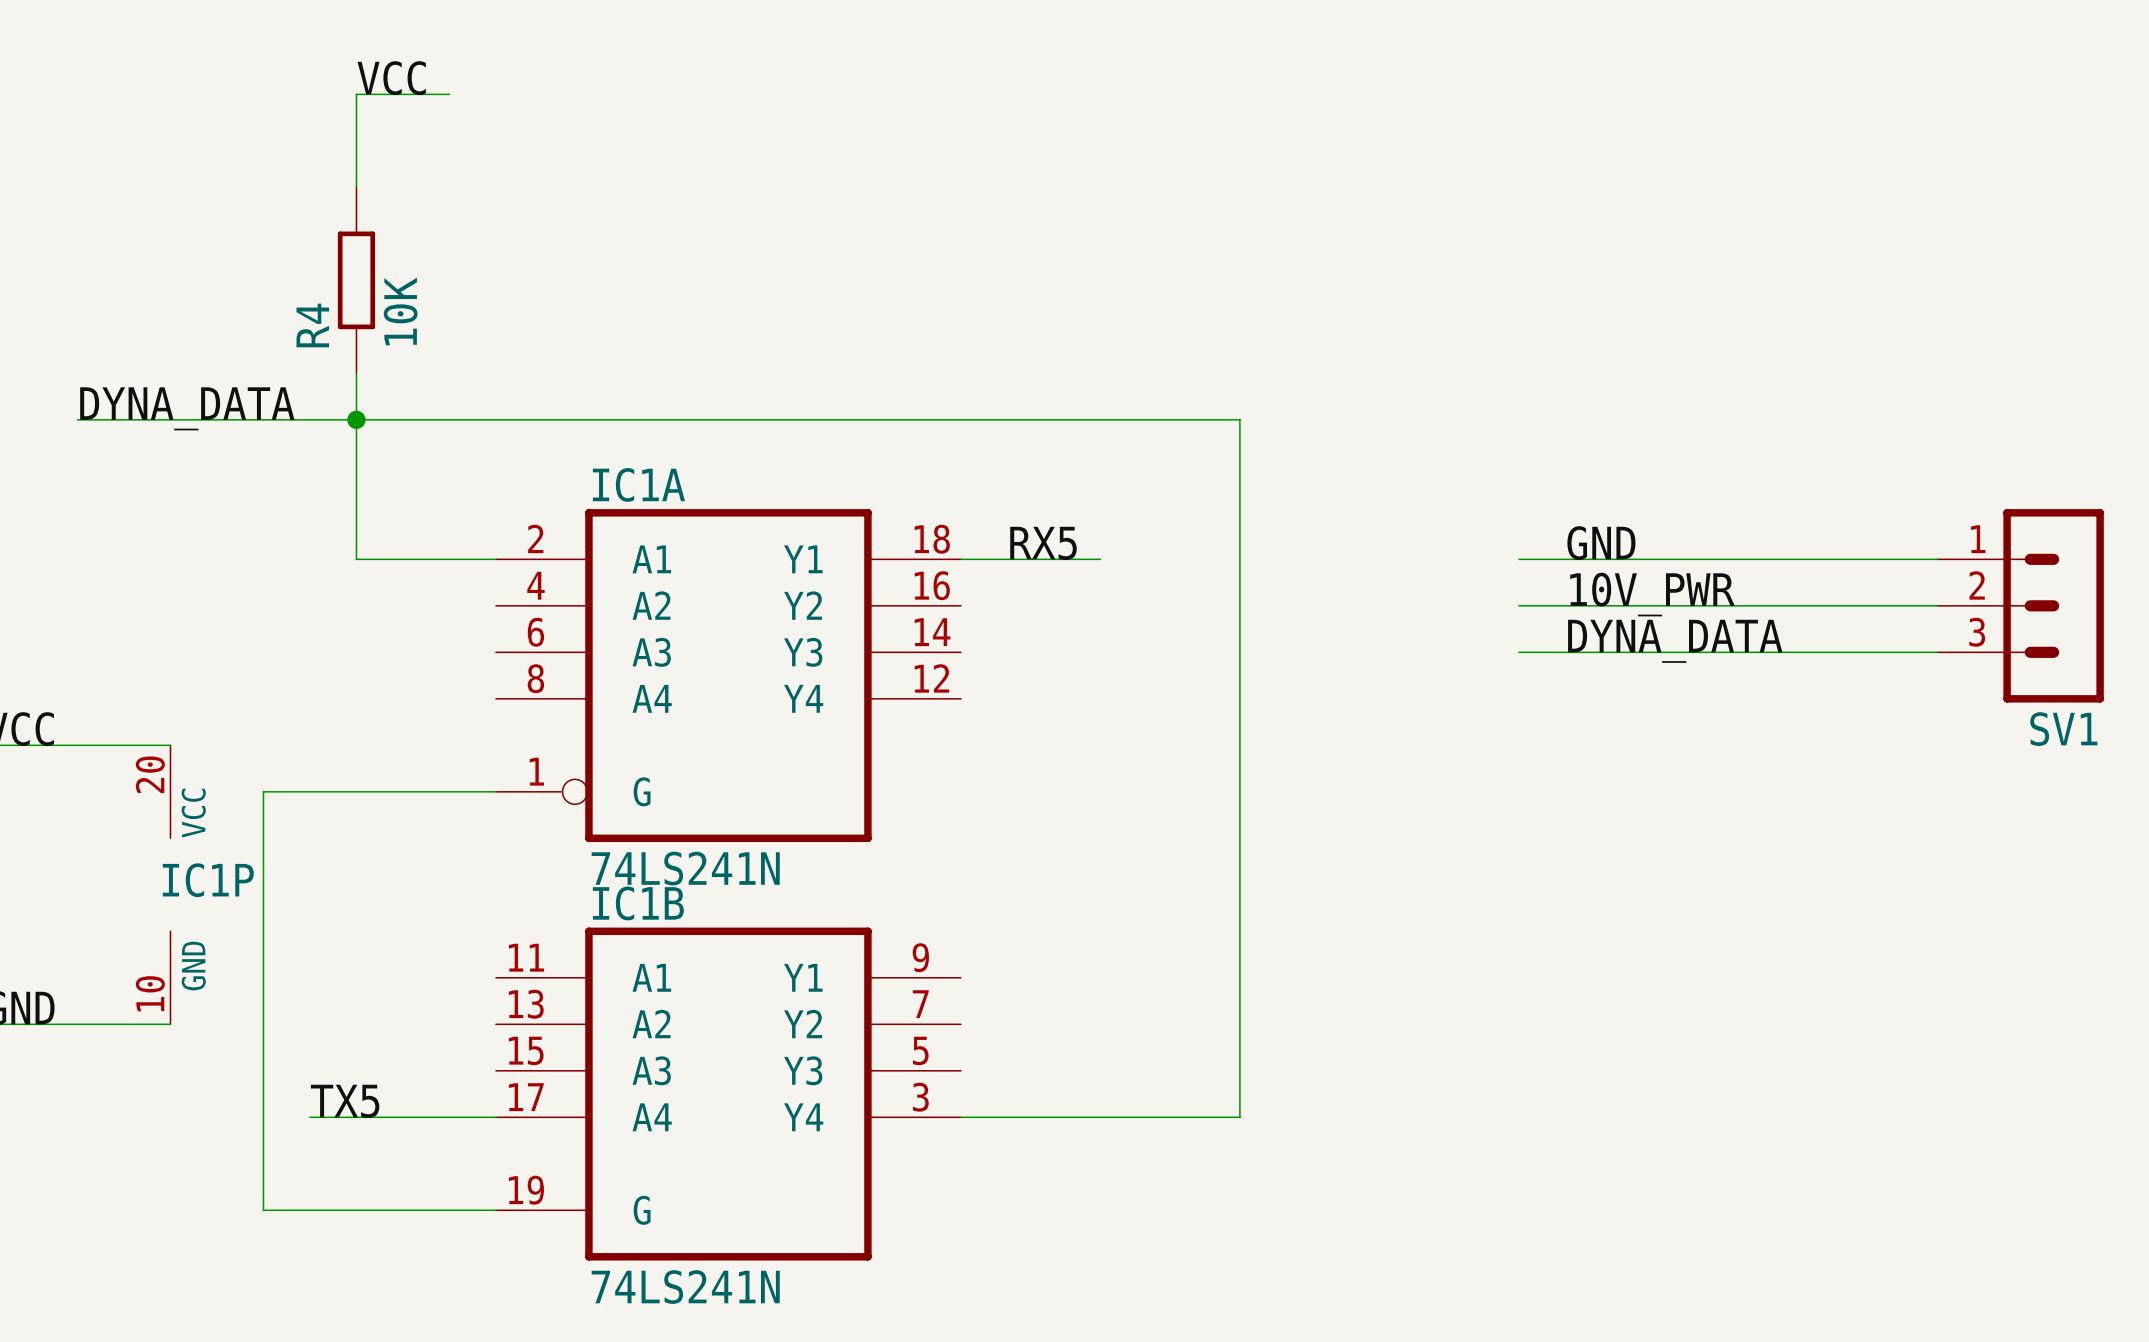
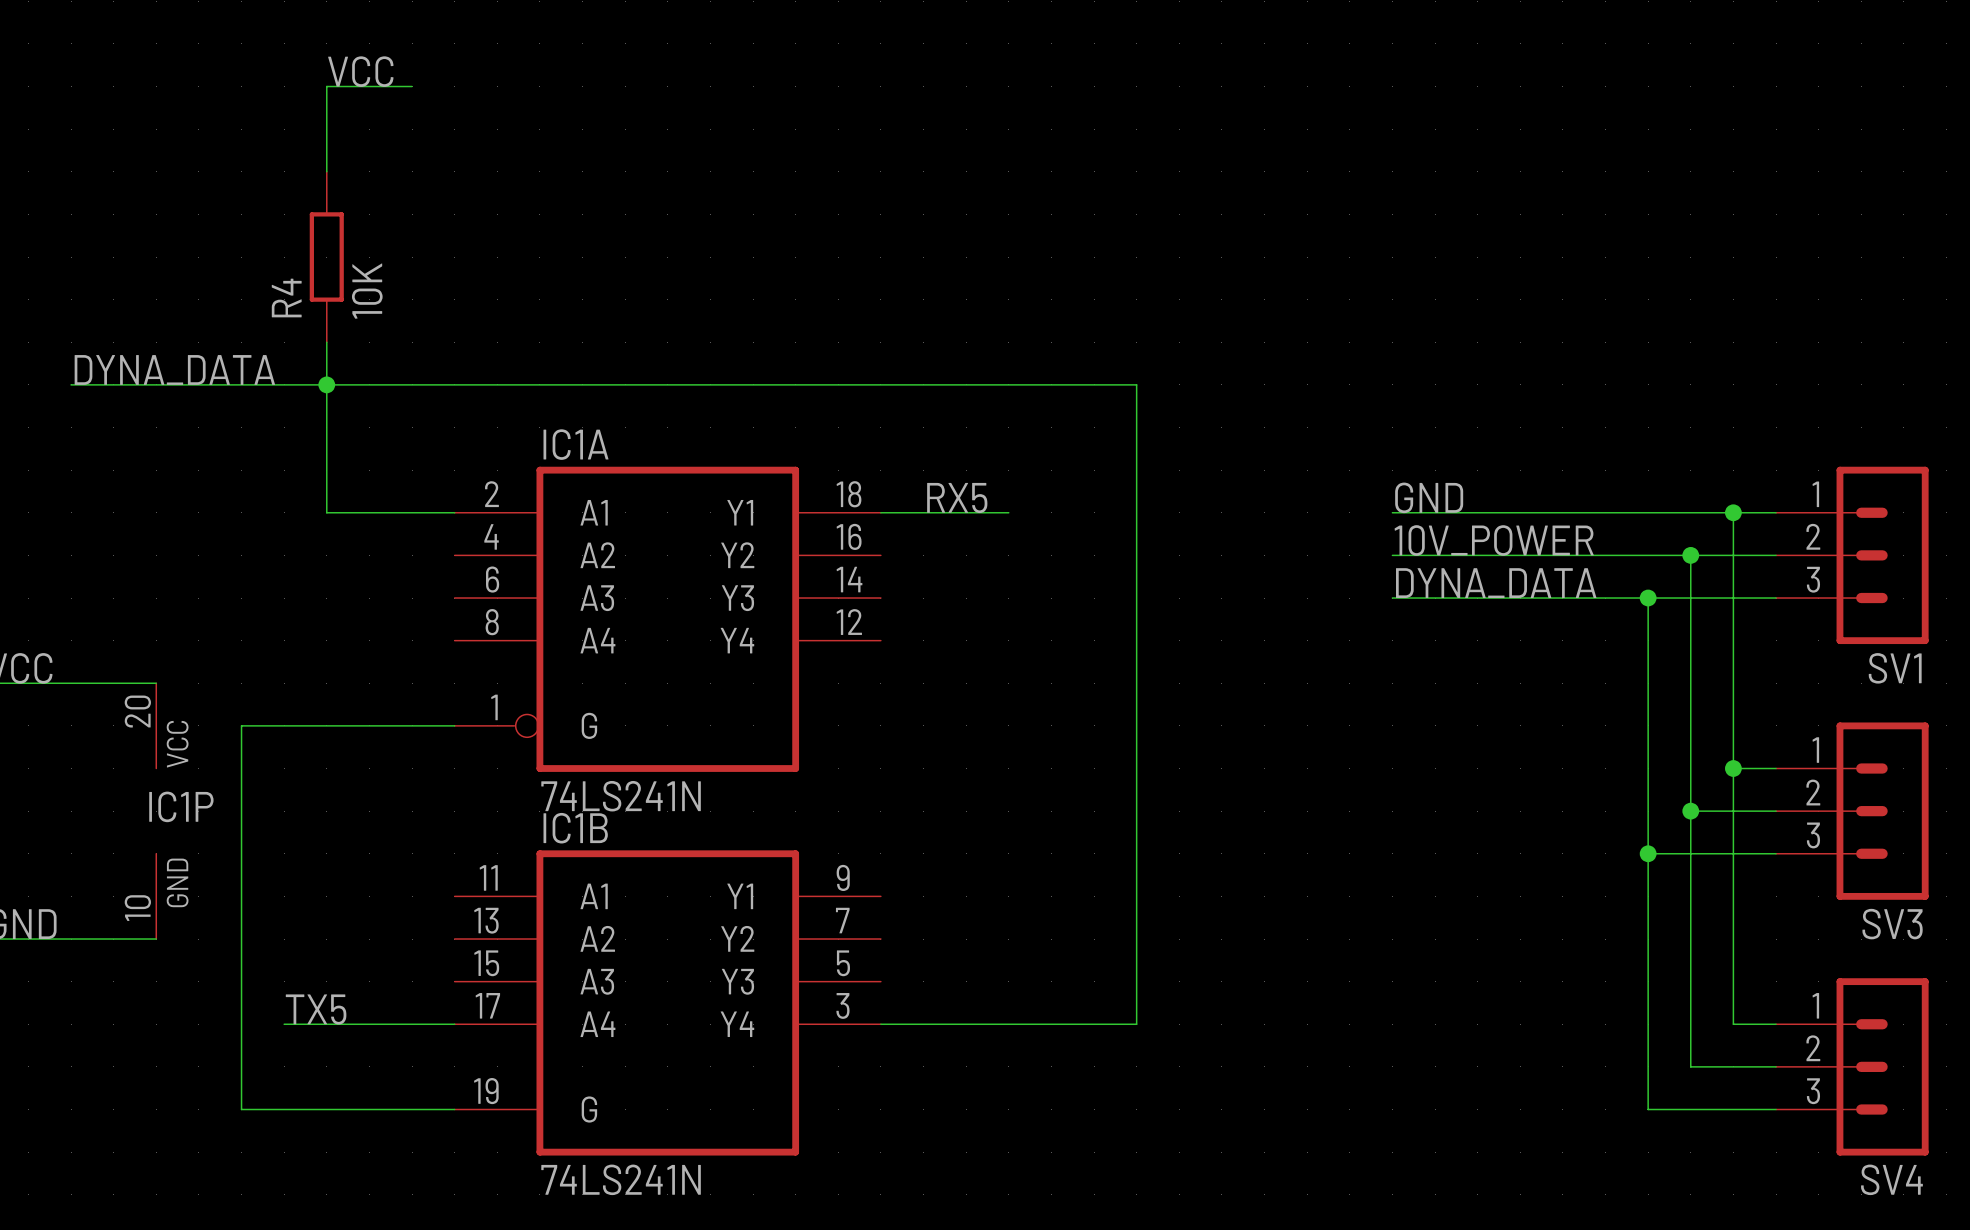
label position: GND (1601, 543) -> GND (1429, 497)
wire: none -> (1733, 512) (1733, 1024) (1776, 1024)
junction: none -> (1733, 512)
label: 10V_PWR (1652, 594) -> 10V_POWER (1494, 540)
wire: none -> (1690, 555) (1690, 1066) (1776, 1066)
junction: none -> (1690, 555)
label position: DYNA_DATA (1675, 641) -> DYNA_DATA (1496, 583)
wire: none -> (1648, 598) (1648, 1109) (1776, 1109)
junction: none -> (1648, 598)
wire: none -> (1733, 768) (1776, 768)
junction: none -> (1733, 768)
wire: none -> (1690, 811) (1776, 811)
junction: none -> (1690, 811)
SV3: none -> (1852, 811)
wire: none -> (1648, 853) (1776, 853)
junction: none -> (1648, 853)
SV4: none -> (1852, 1066)

